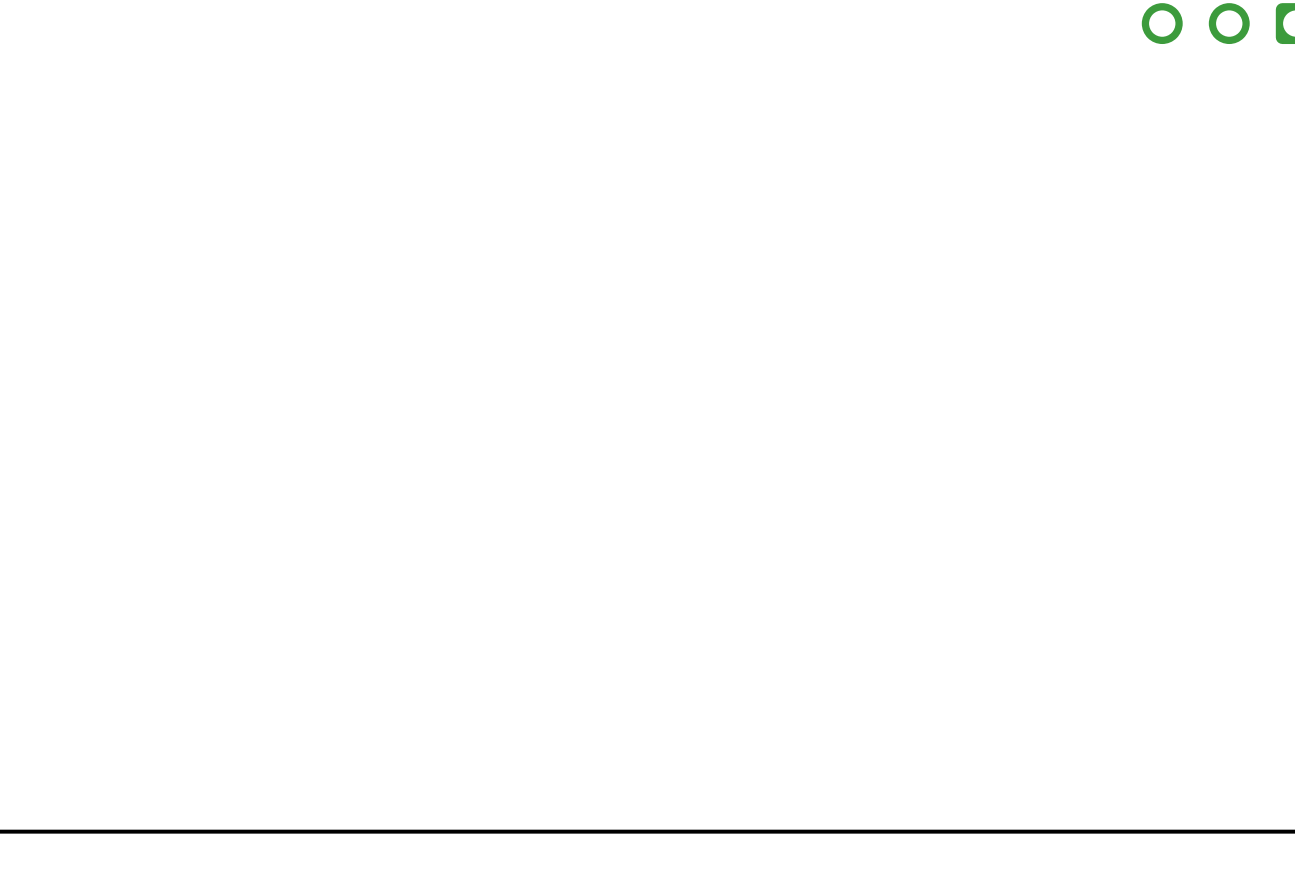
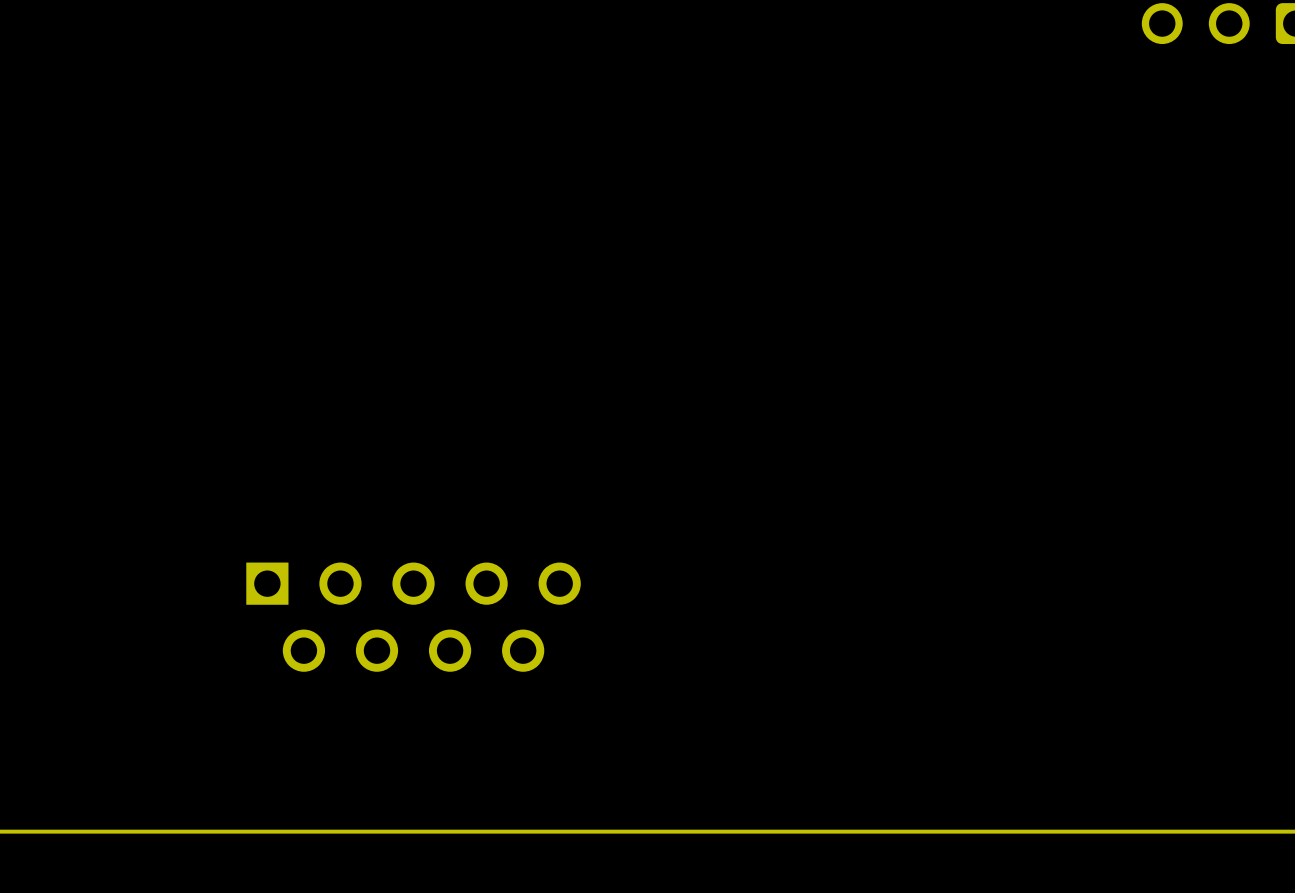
part: none -> (413, 617)

